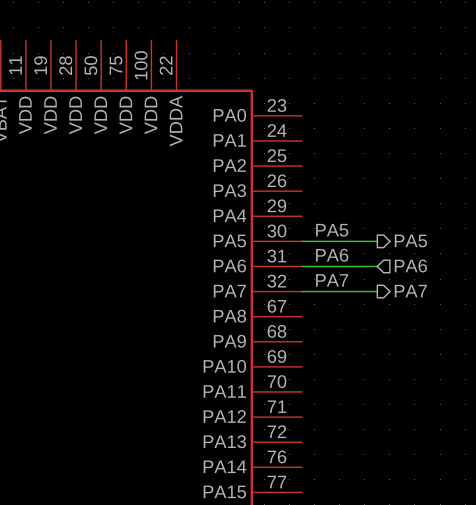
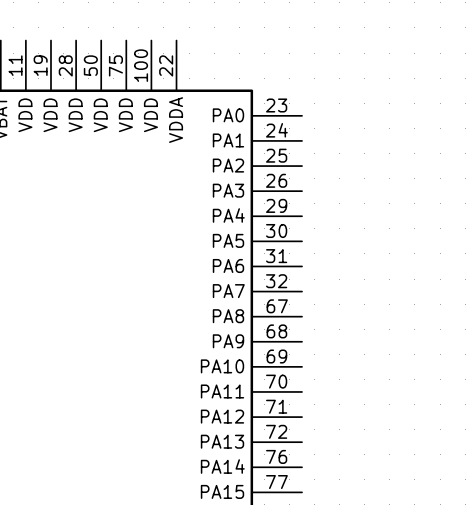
label: PA5 (332, 230) -> none
hierarchical label: PA5 (410, 240) -> none
wire: (302, 241) (377, 241) -> none
label: PA6 (332, 255) -> none
hierarchical label: PA6 (410, 265) -> none
wire: (302, 266) (377, 266) -> none
label: PA7 (332, 280) -> none
wire: (302, 291) (377, 291) -> none
hierarchical label: PA7 (410, 291) -> none

